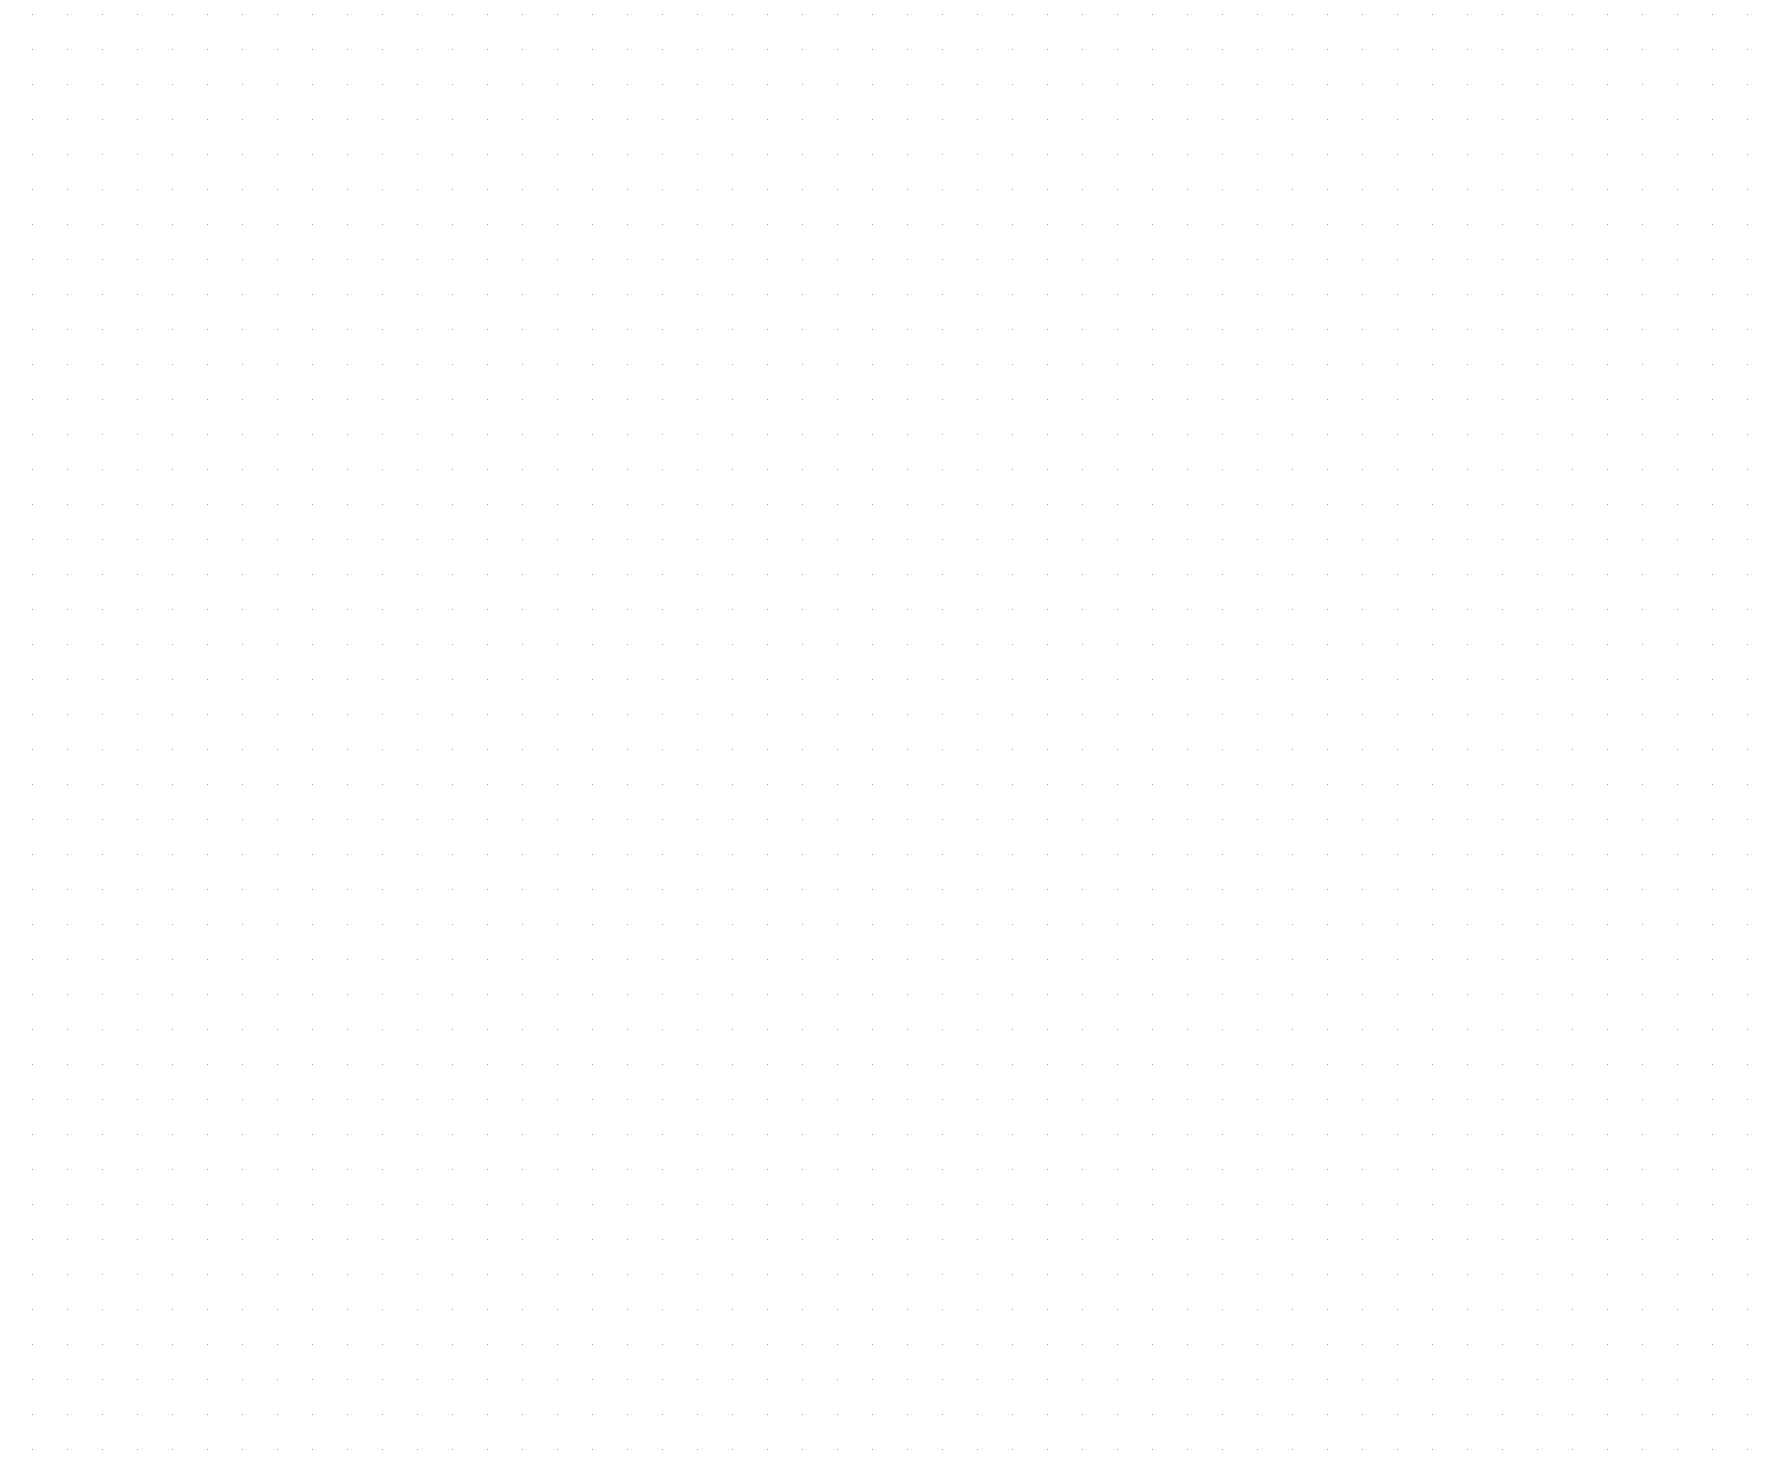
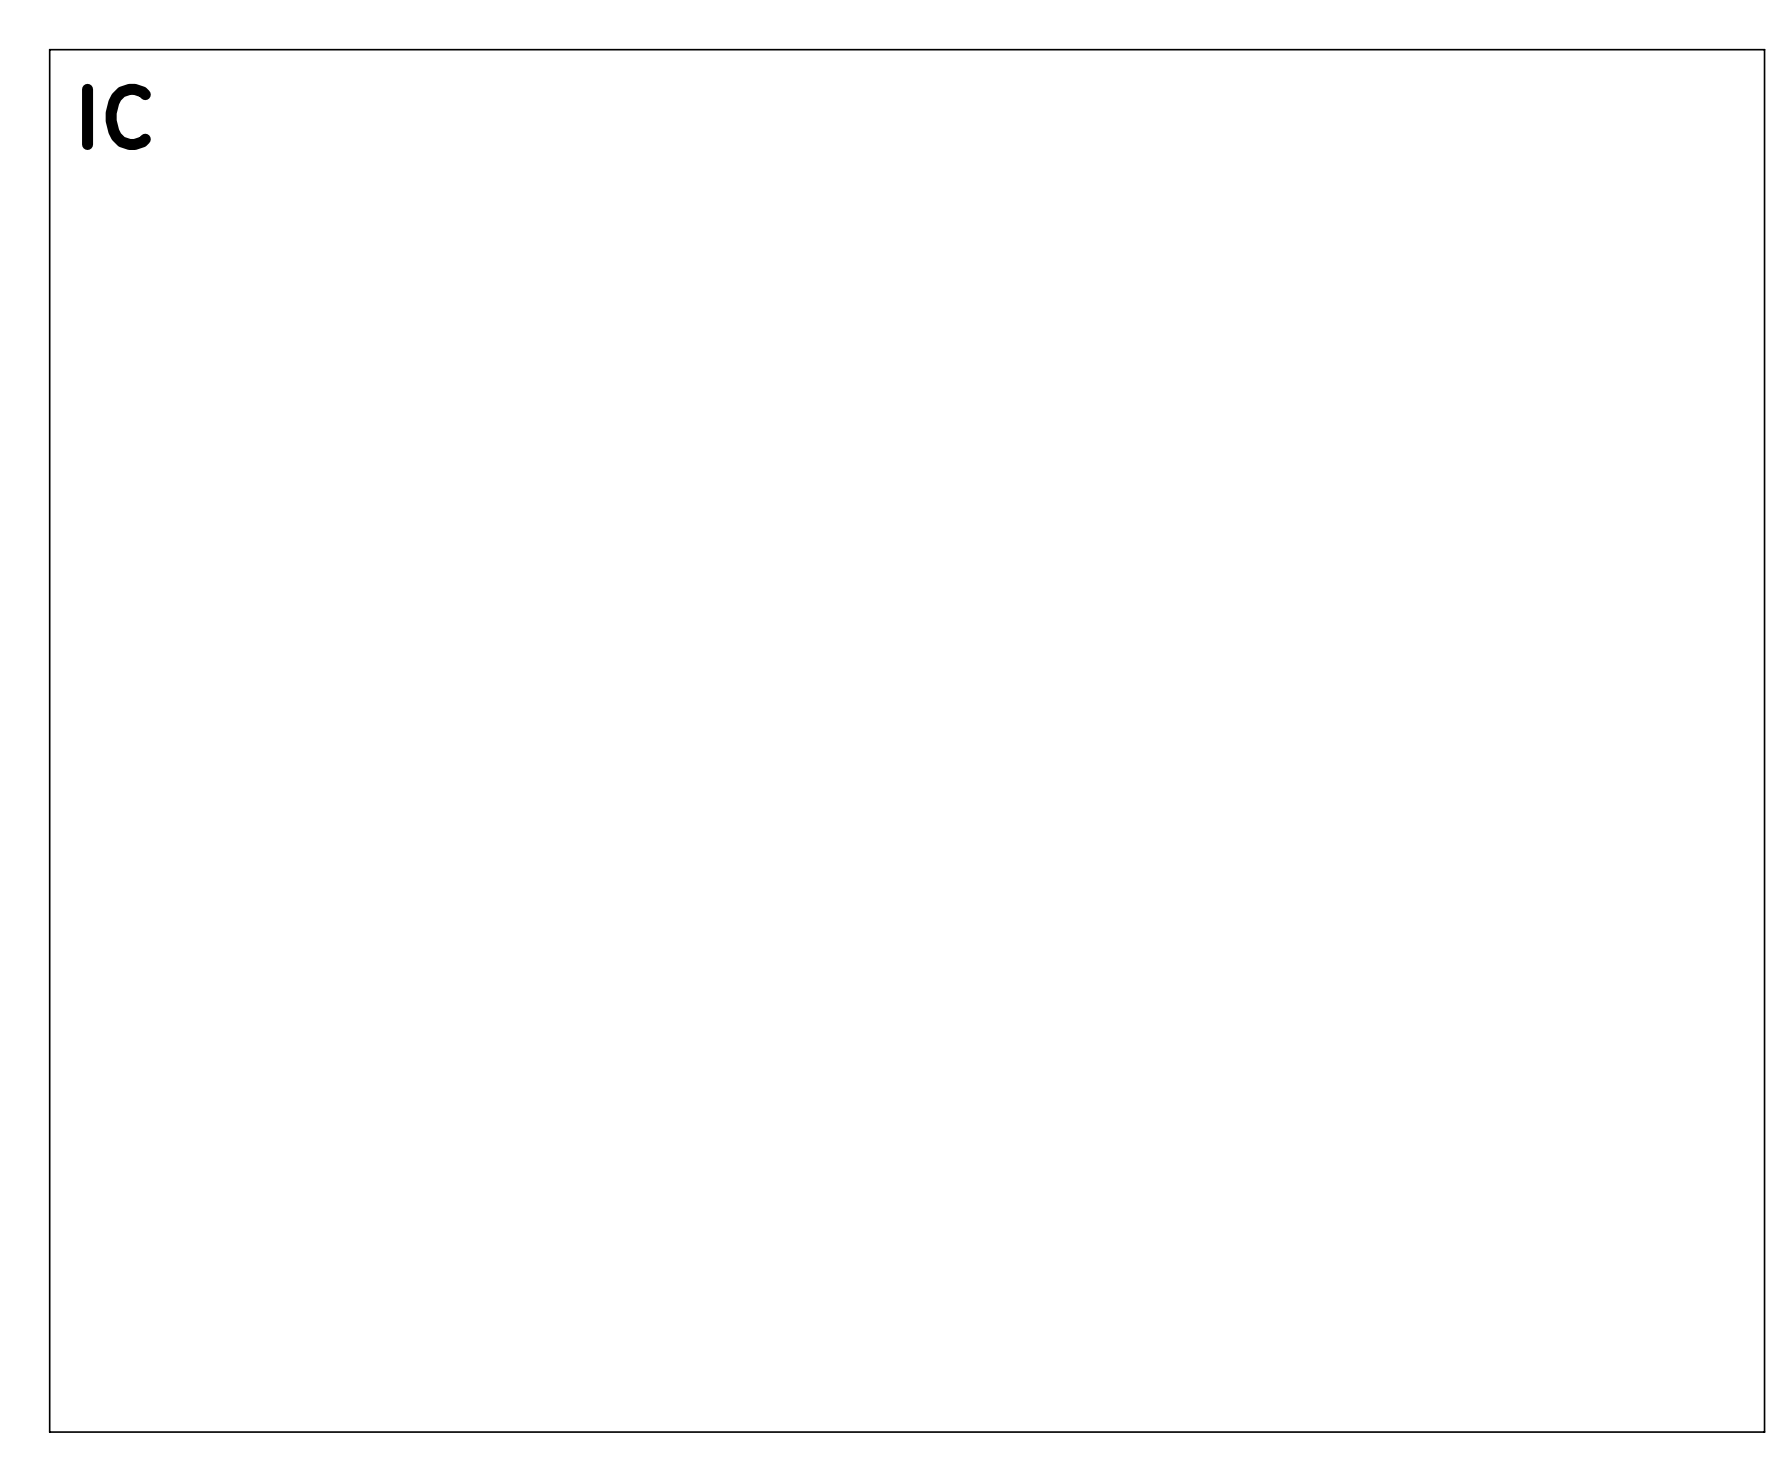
line: none -> (49, 49) (1764, 49) (1764, 1432) (49, 1432) (49, 49)
text: none -> IC (116, 116)

